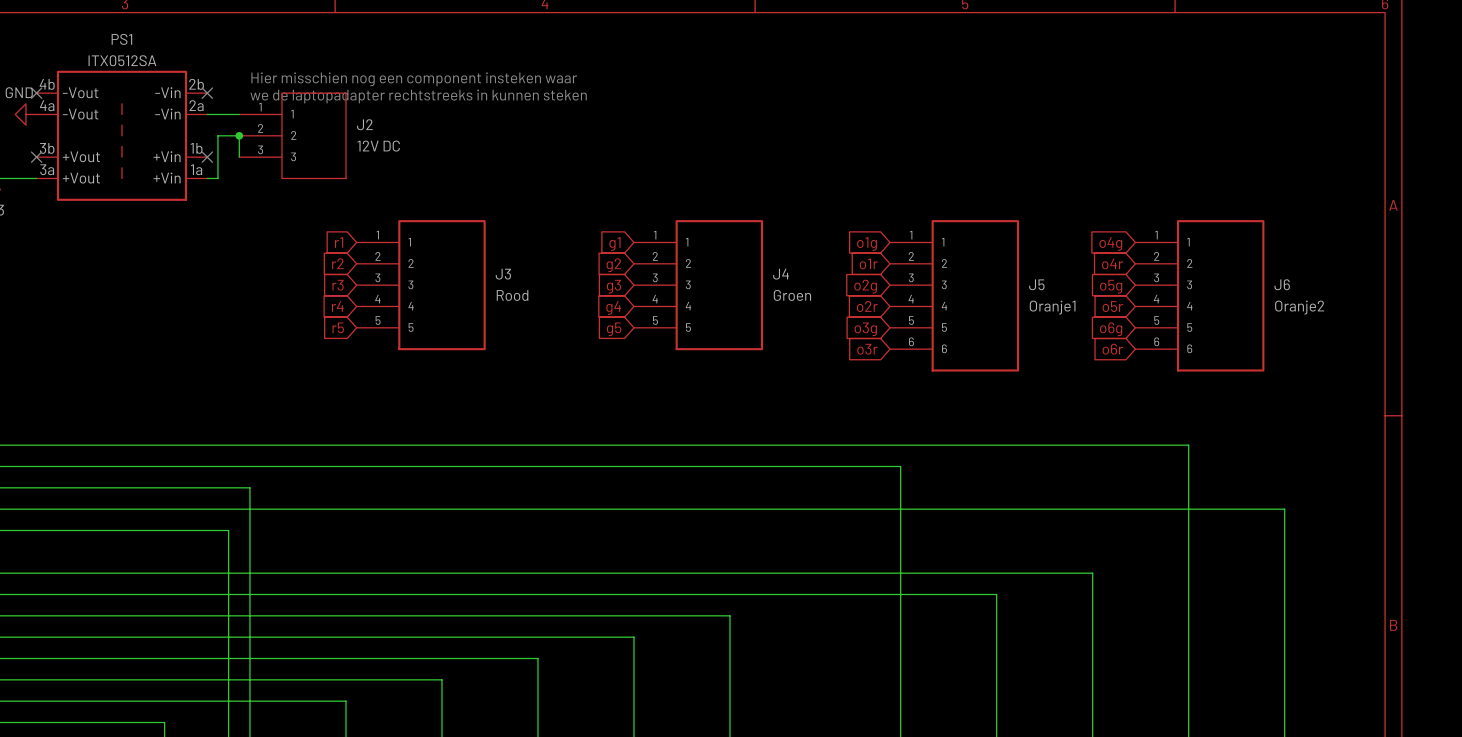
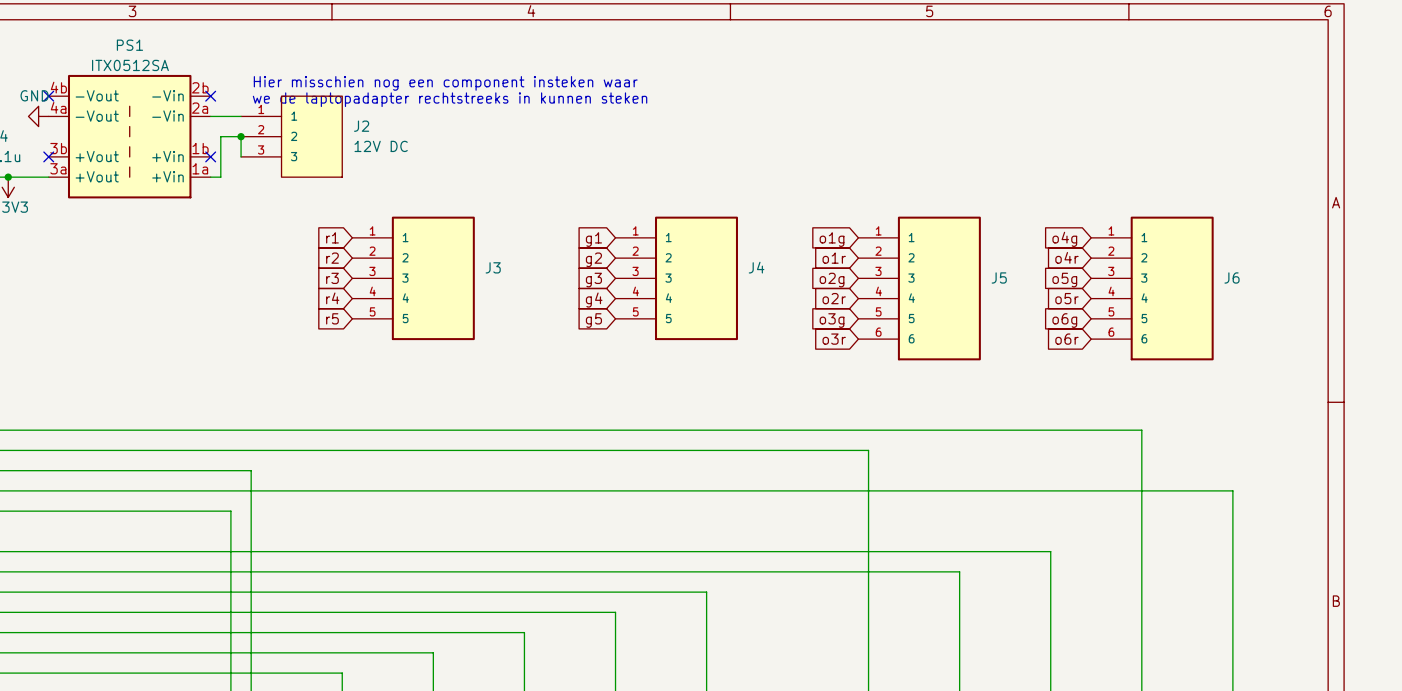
J3 value: Rood (512, 295) -> none
J4 value: Groen (792, 295) -> none
J5 value: Oranje1 (1052, 307) -> none
J6 value: Oranje2 (1299, 307) -> none

